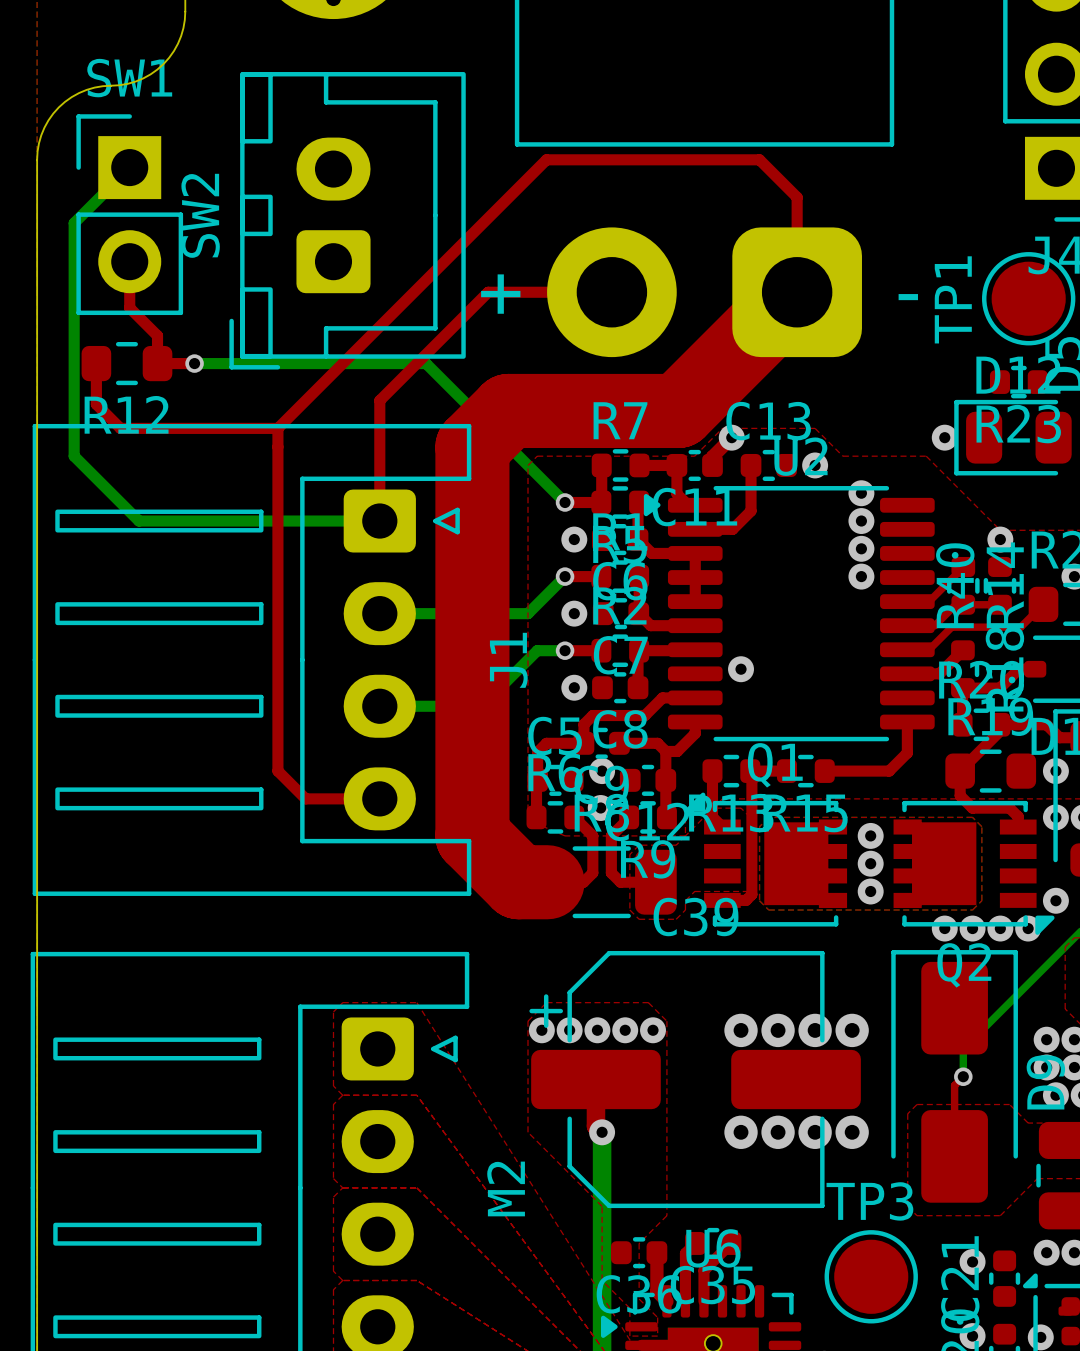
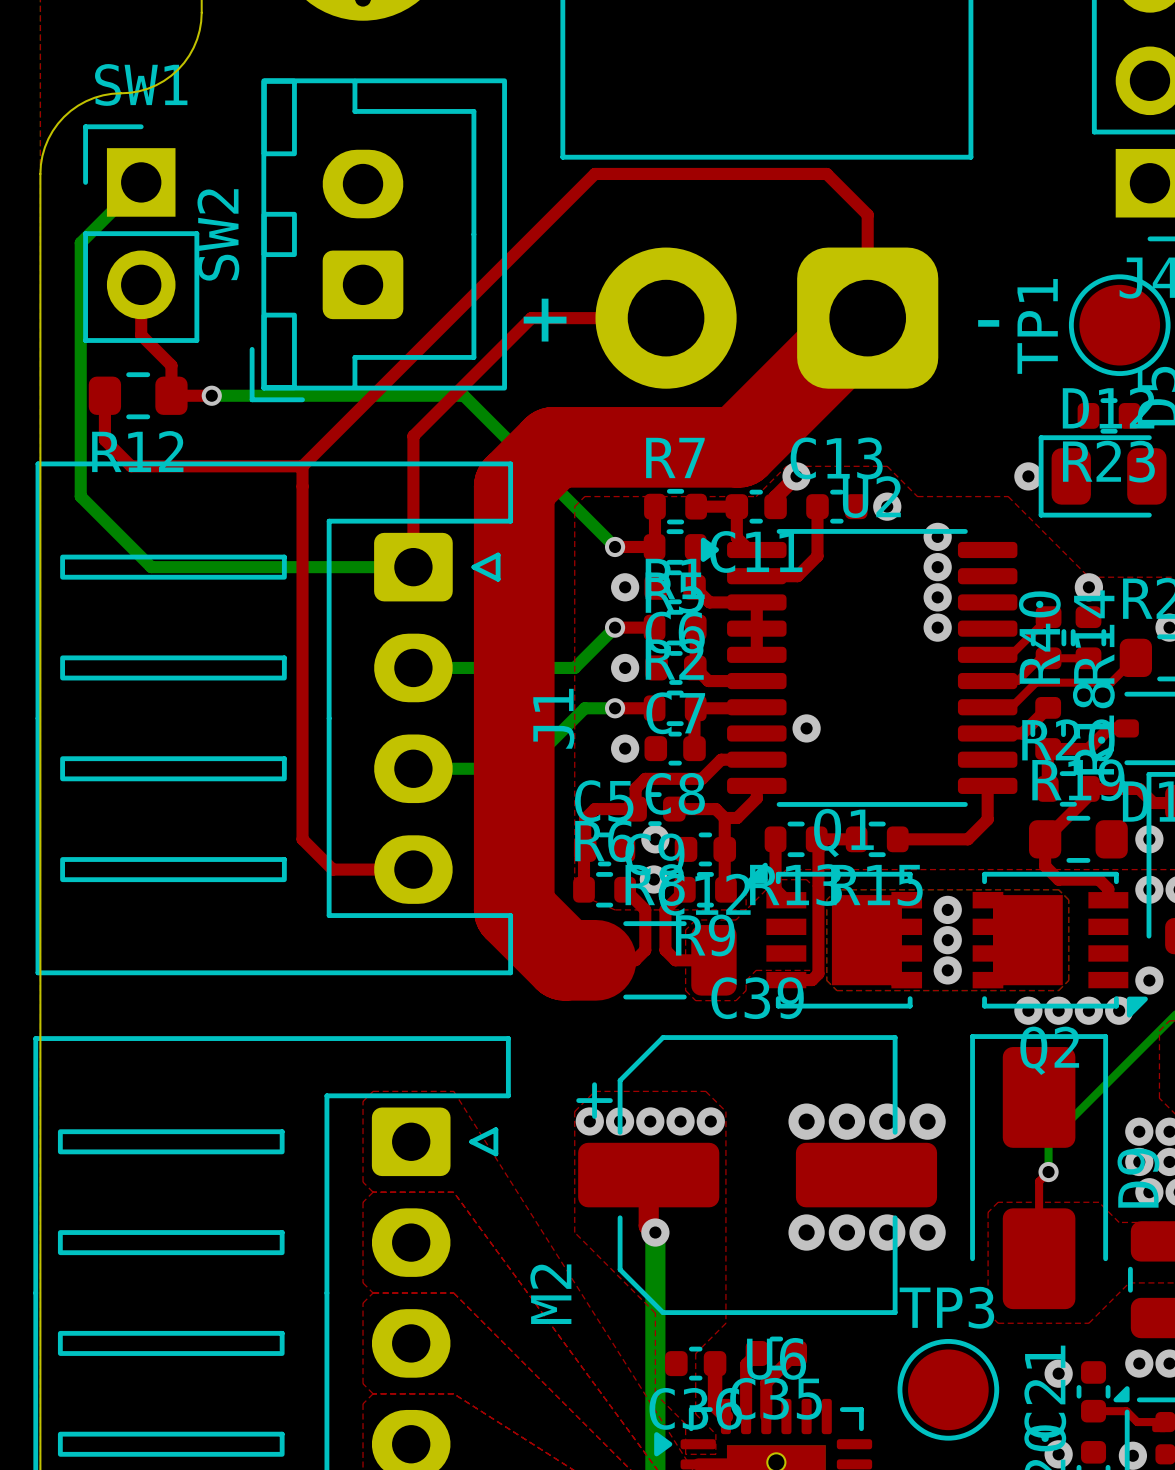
top track: none -> (1093, 1411) (1126, 1411) (1137, 1422) (1165, 1422)

